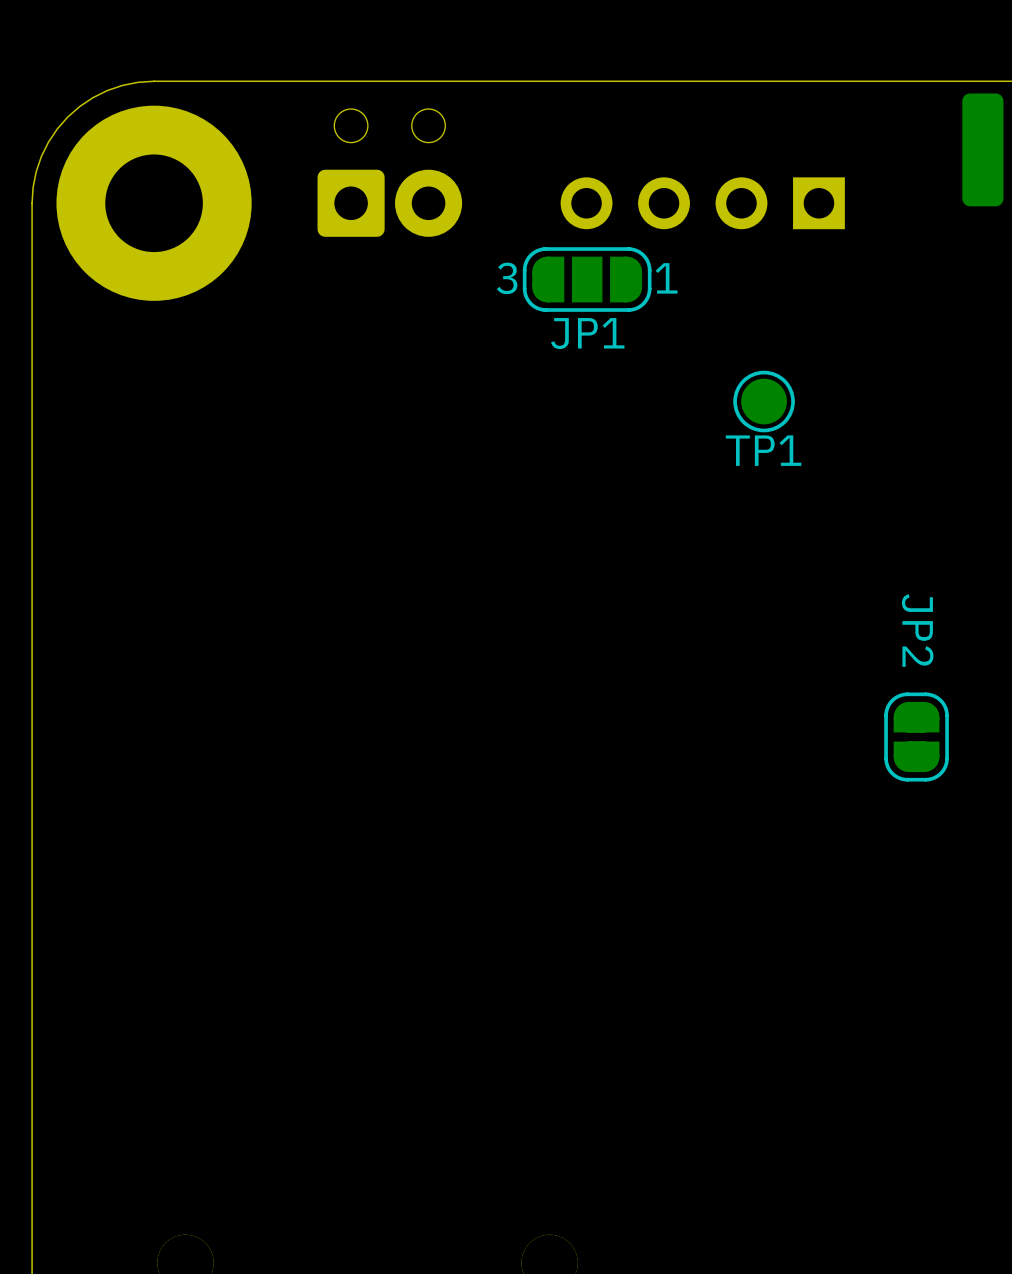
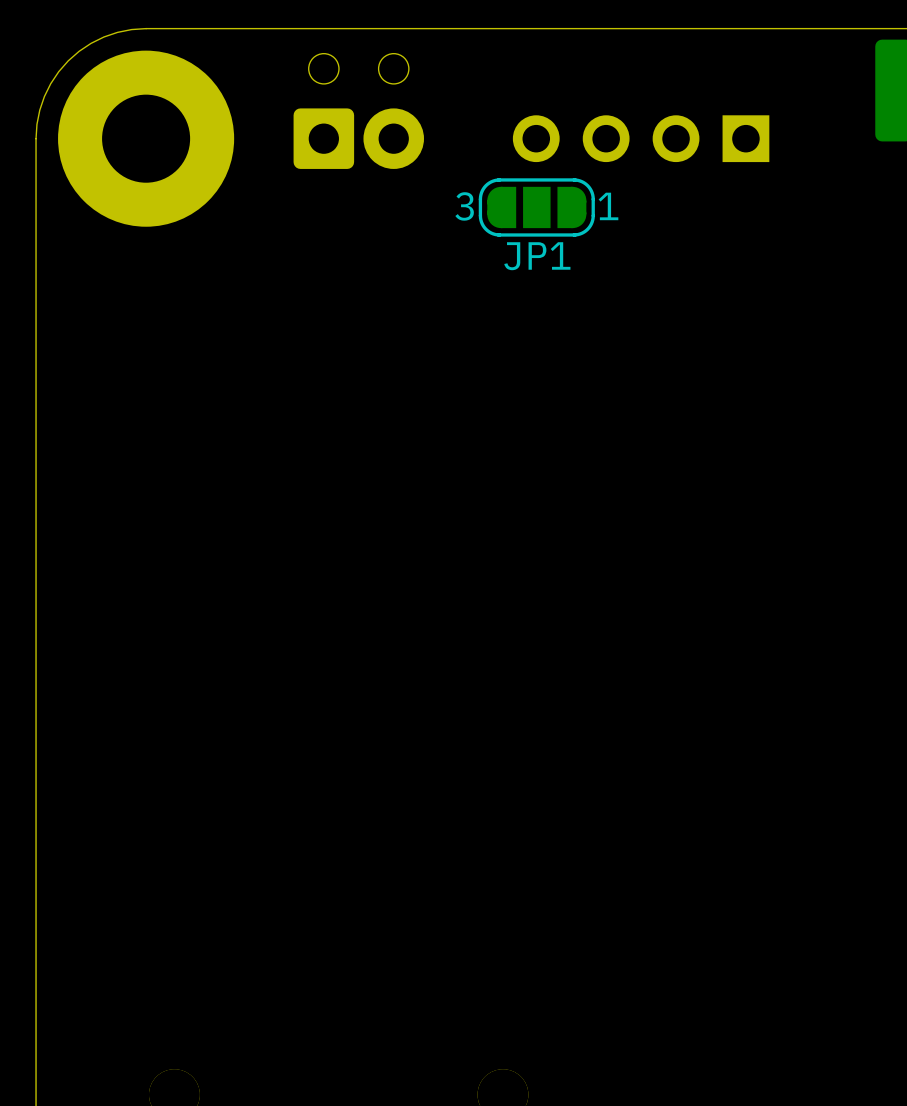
TP1: (764, 401) -> none
JP2: (916, 737) -> none

